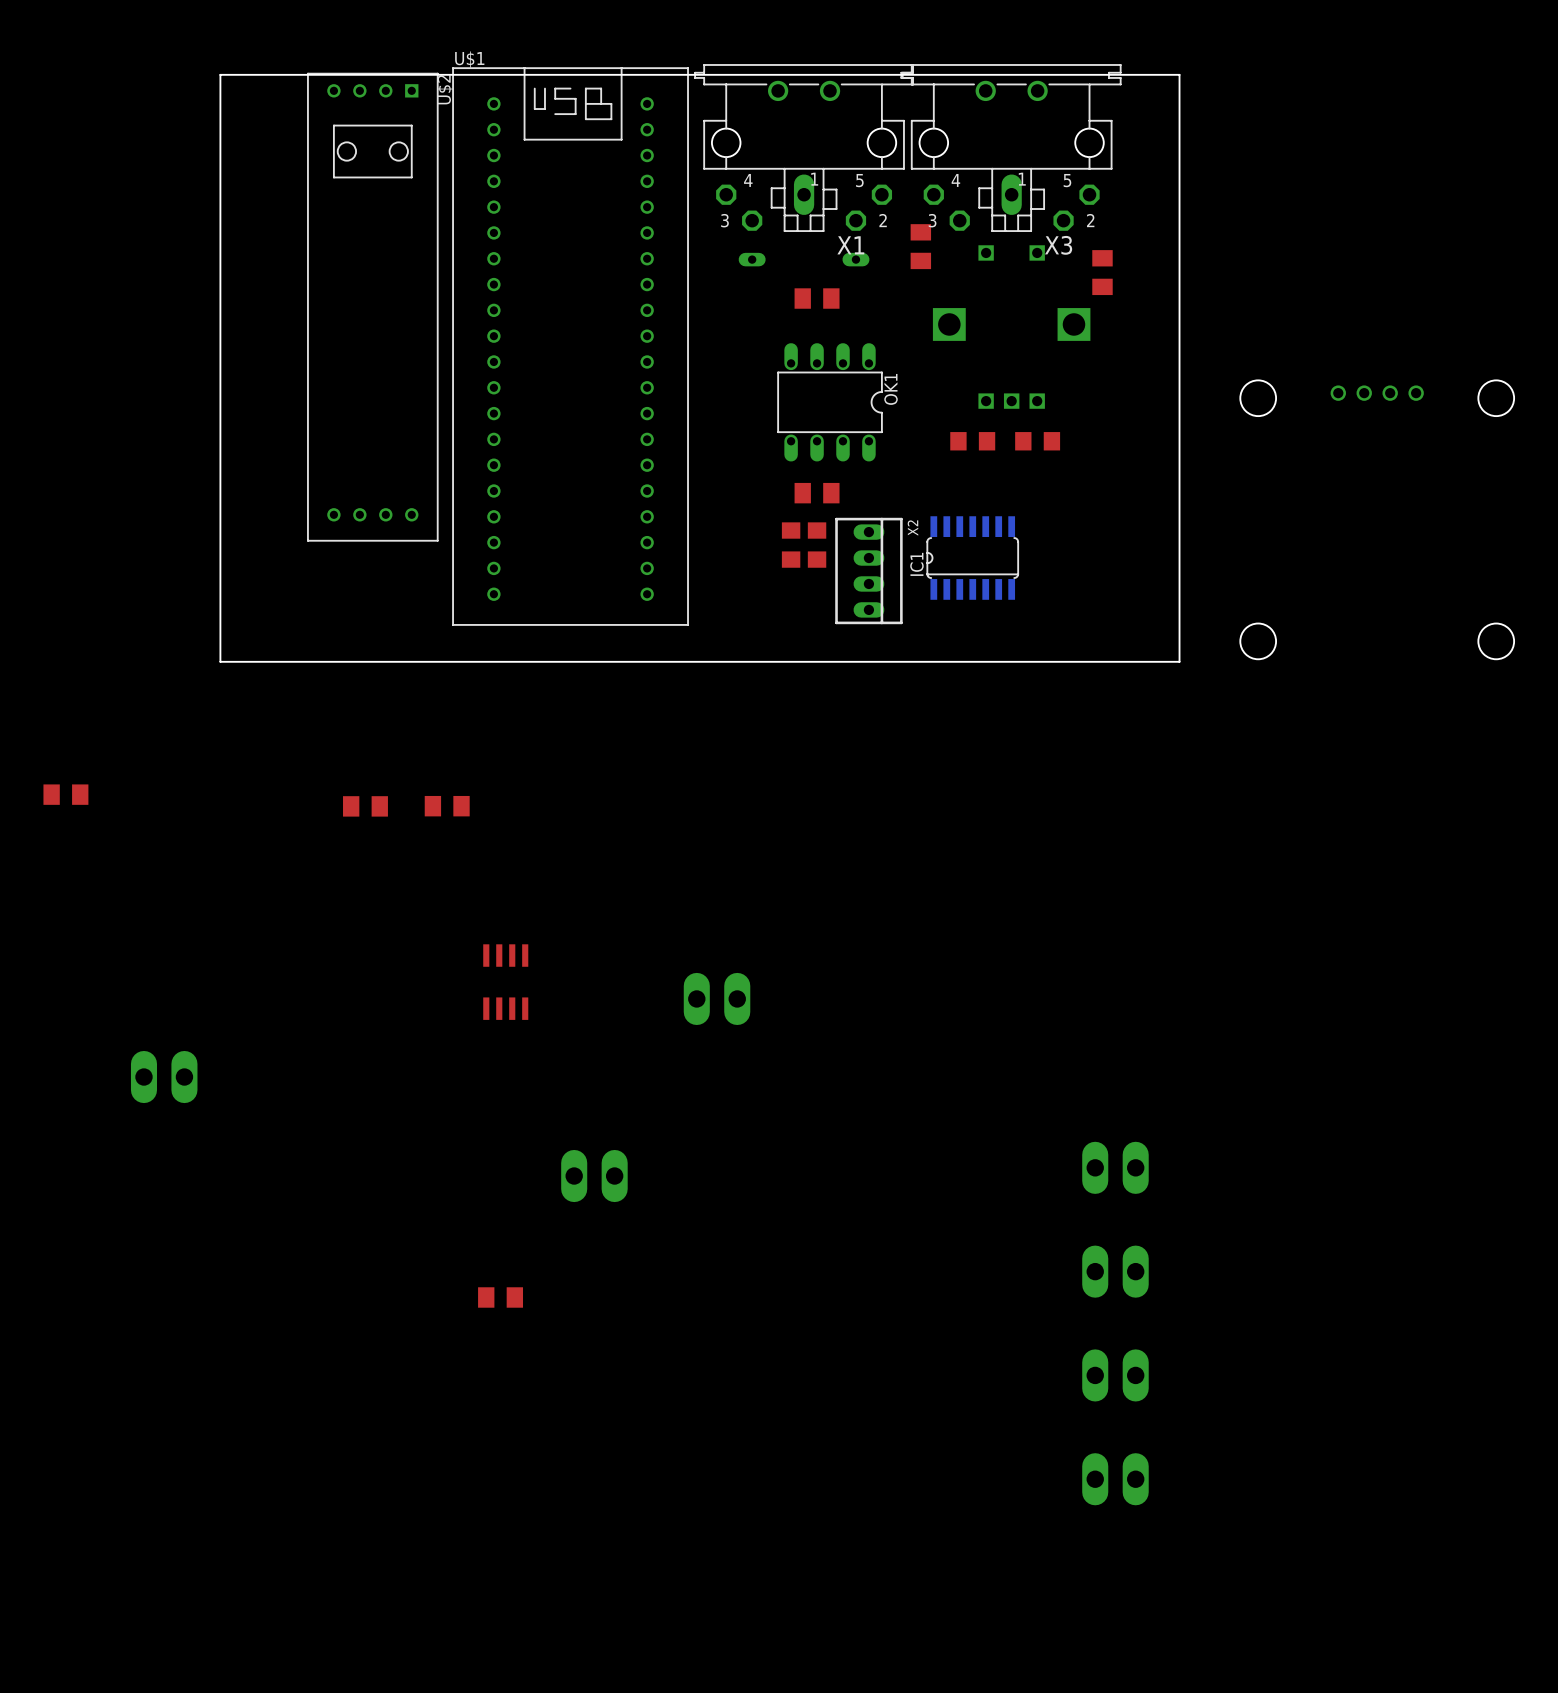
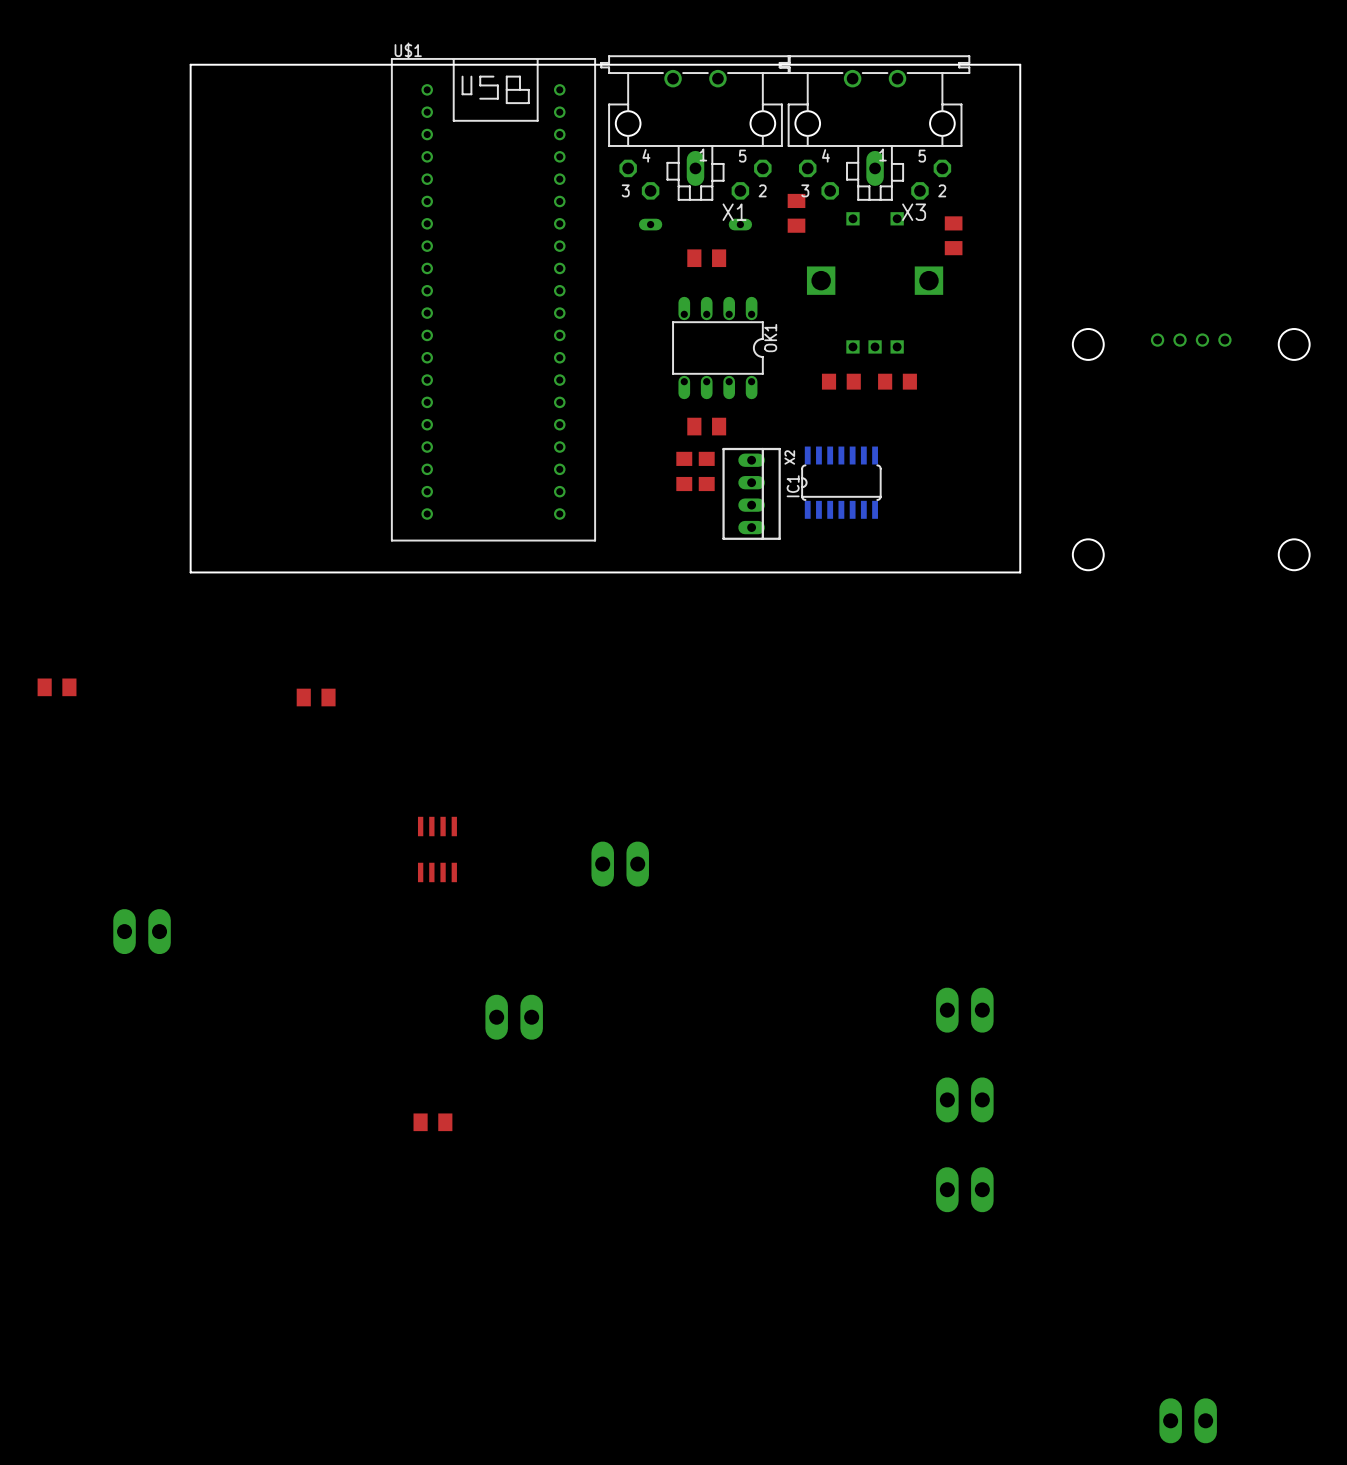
U$2: (372, 307) -> none
part: (447, 806) -> none
part: (1115, 1479) -> none
part: none -> (1188, 1420)

